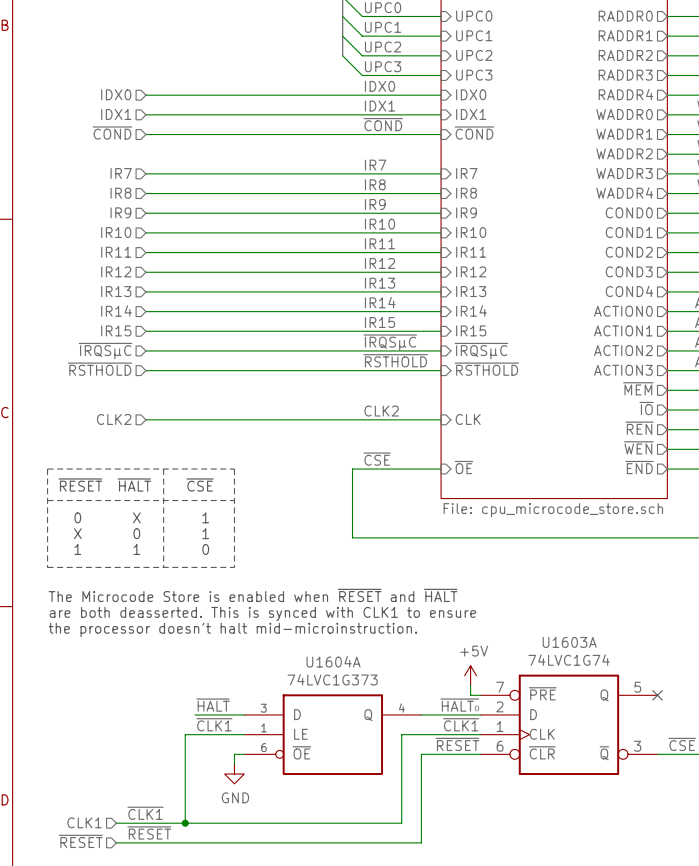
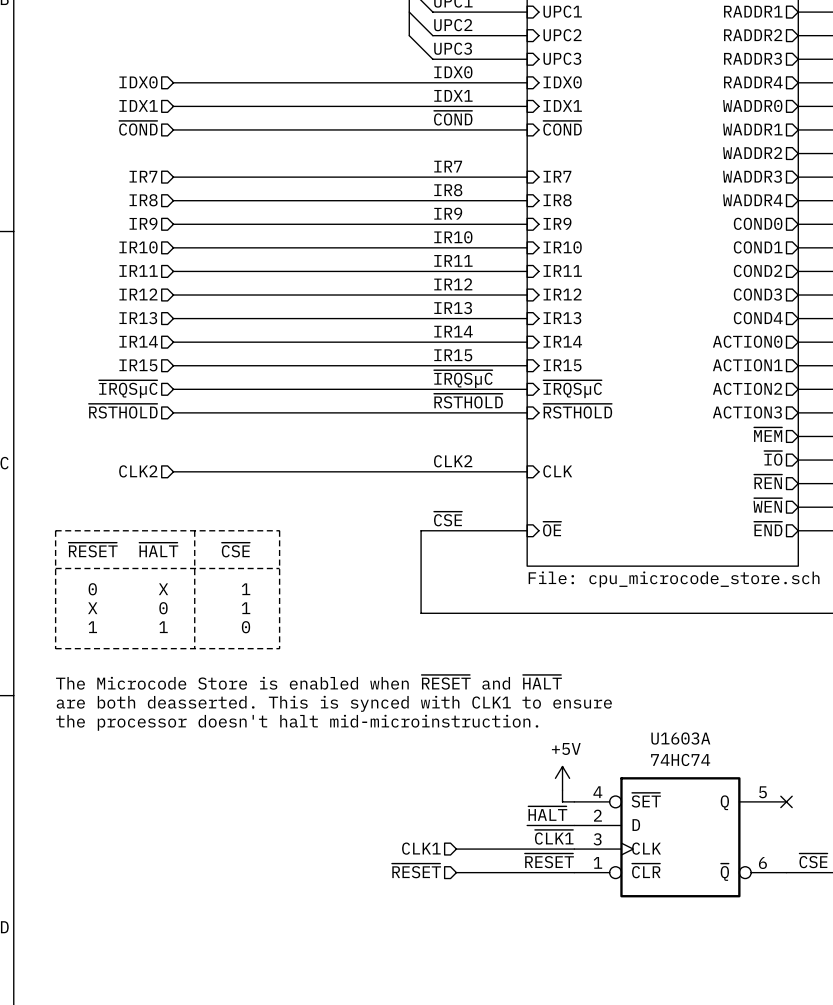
U1603A value: 74LVC1G74 (568, 660) -> 74HC74 (680, 759)
U1603A pin number: 7 (500, 687) -> 4 (597, 792)
U1603A pin name: ~{PRE} (542, 693) -> ~{SET} (646, 800)
label: ~{HALT} (213, 705) -> none
label: ~{HALT₀} (460, 705) -> ~{HALT} (547, 813)
wire: (195, 714) (244, 714) -> none
wire: (421, 714) (441, 714) -> none
label: ~{CLK1} (214, 724) -> none
U1603A pin number: 1 (500, 726) -> 3 (597, 839)
wire: (244, 734) (185, 734) (185, 823) -> none
U1604A: 74LVC1G373 (332, 734) -> none
hierarchical label: none -> CLK1 (421, 848)
wire: (401, 734) (401, 823) (116, 823) -> (480, 849) (456, 849)
U1603A pin number: 6 (500, 746) -> 1 (597, 862)
U1603A pin number: 3 (637, 746) -> 6 (762, 863)
hierarchical label: none -> ~{RESET} (416, 870)
wire: (244, 754) (234, 754) (234, 764) -> none
wire: (421, 754) (421, 842) (116, 842) -> (503, 872) (456, 872)
power symbol: GND (234, 774) -> none
label: ~{CLK1} (145, 813) -> none
hierarchical label: CLK1 (84, 822) -> none
junction: (185, 823) -> none
label: ~{RESET} (149, 832) -> none
hierarchical label: ~{RESET} (80, 841) -> none

